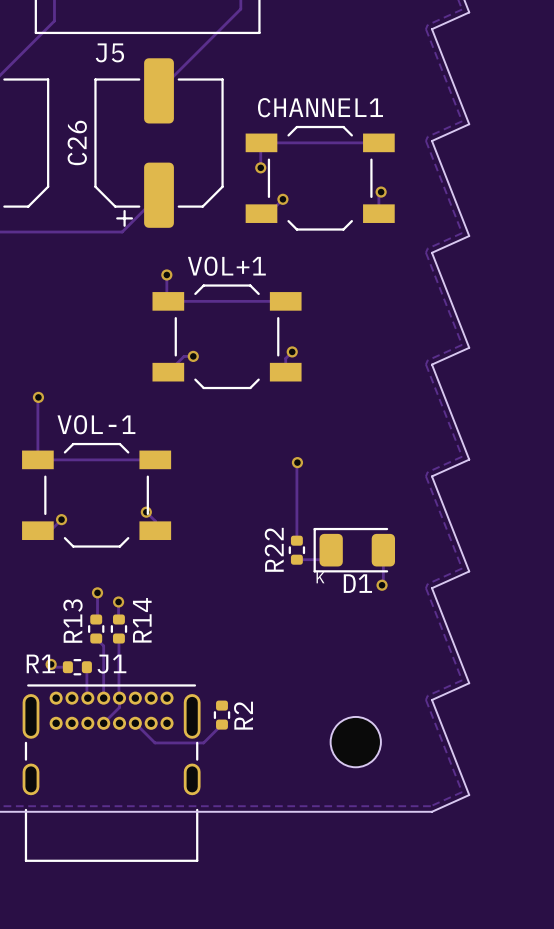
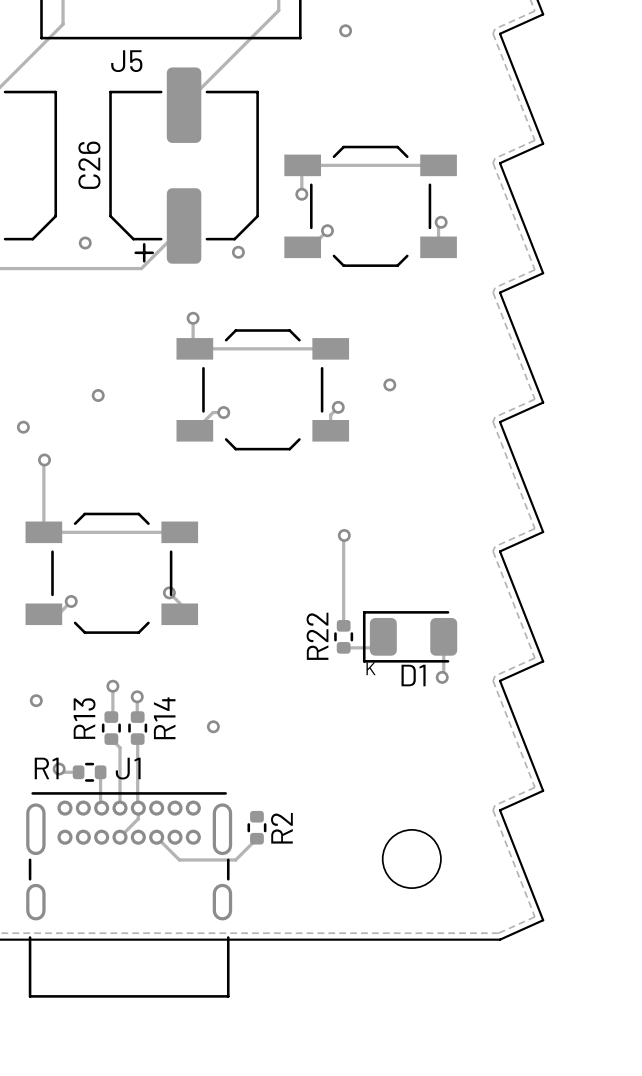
via: none -> (345, 30)
CHANNEL1 name: CHANNEL1 (320, 107) -> none
via: none -> (85, 243)
via: none -> (238, 252)
VOL+1 name: VOL+1 (226, 266) -> none
via: none -> (389, 384)
via: none -> (98, 395)
via: none -> (23, 427)
VOL-1 name: VOL-1 (96, 424) -> none
via: none -> (36, 700)
via: none -> (213, 726)

